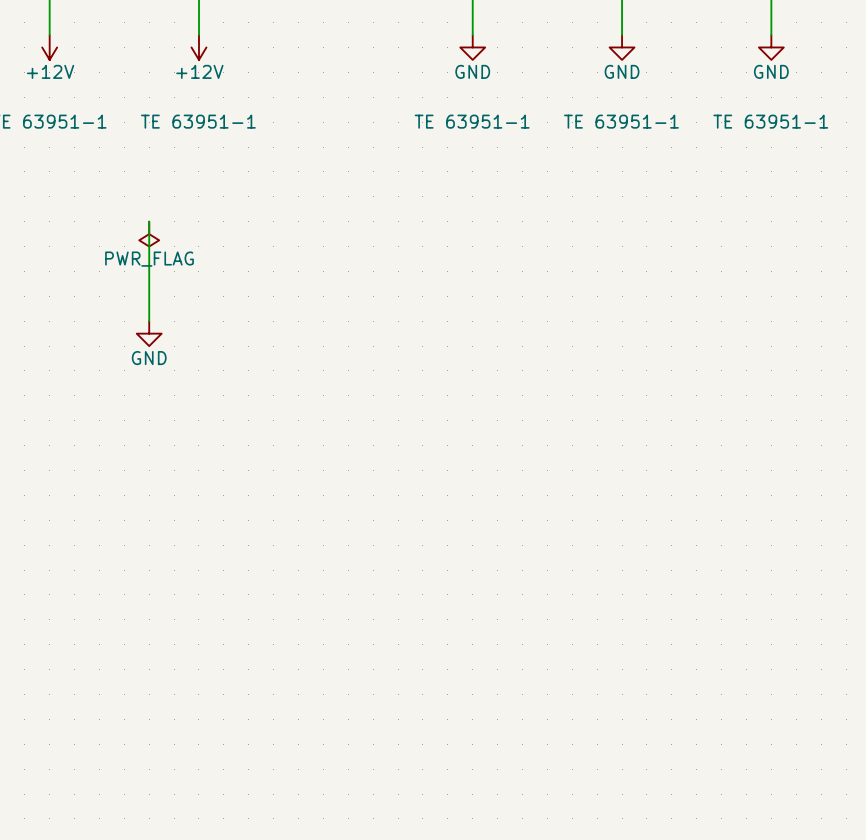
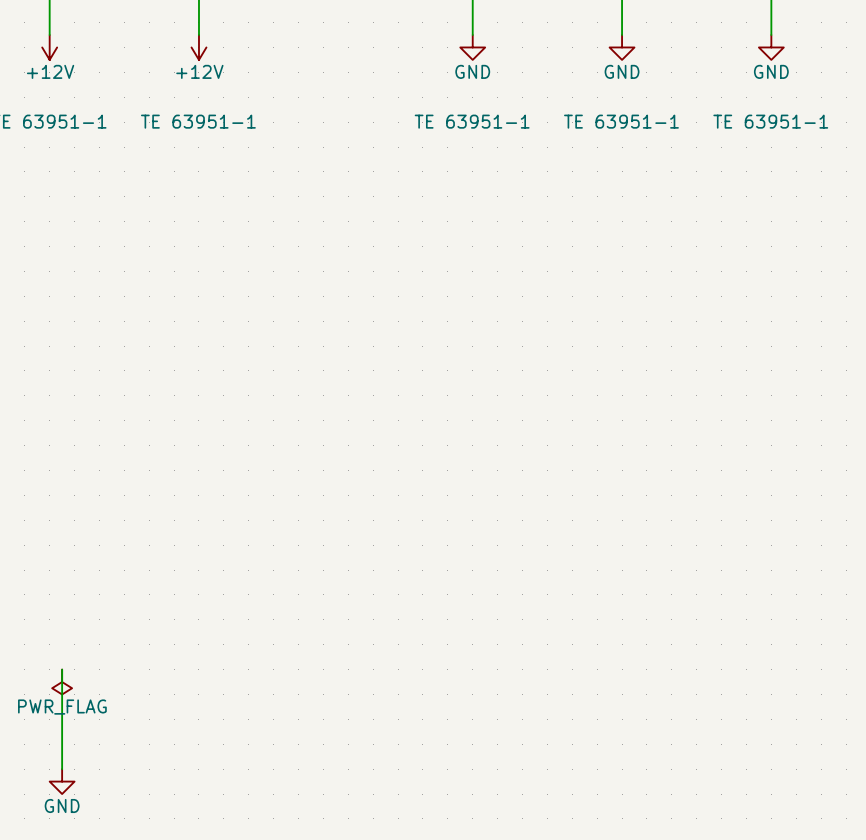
wire: (149, 221) (149, 321) -> none
power symbol: PWR_FLAG (149, 234) -> none
power symbol: GND (149, 333) -> none
wire: none -> (62, 669) (62, 769)
power symbol: none -> PWR_FLAG (62, 682)
power symbol: none -> GND (62, 781)

